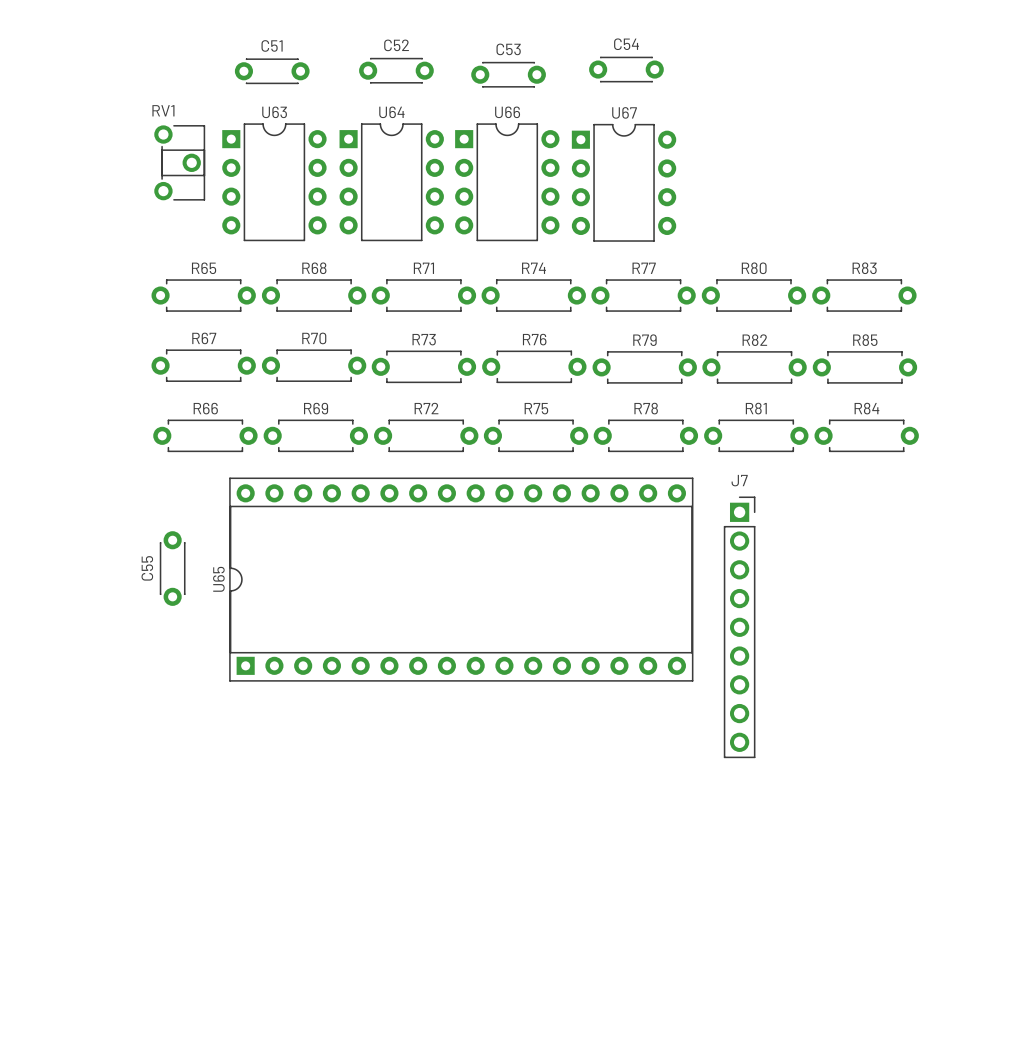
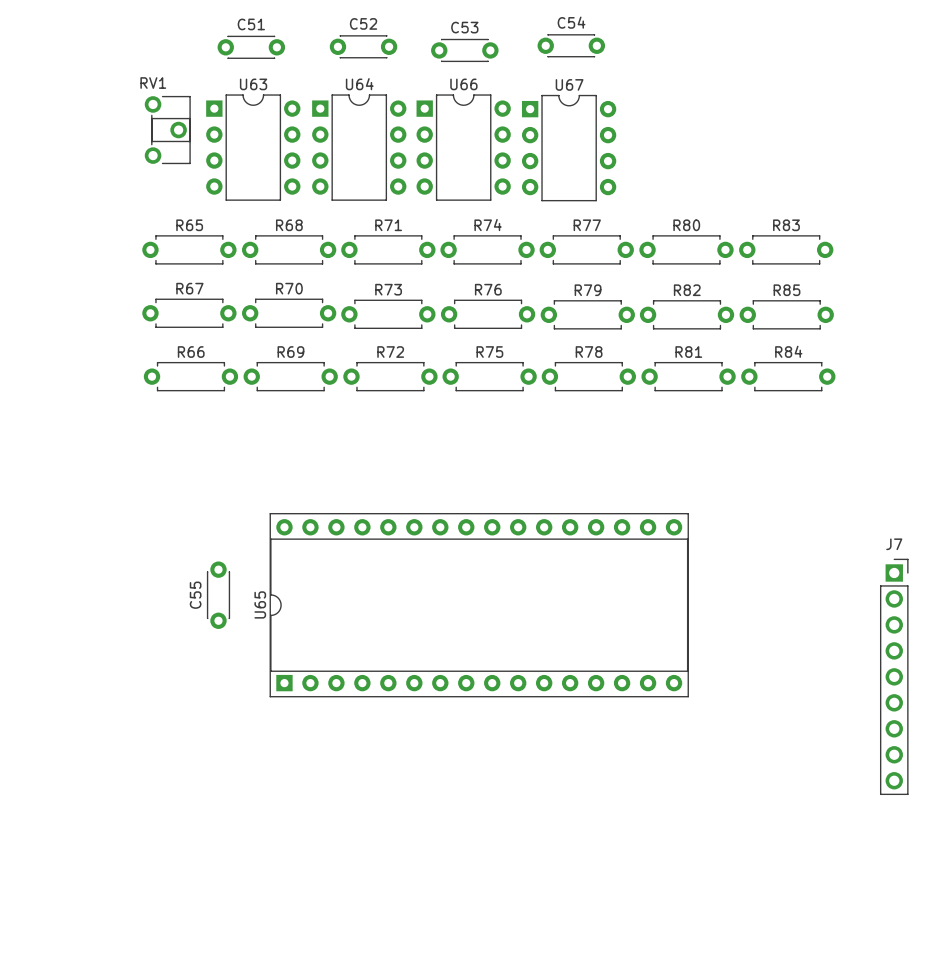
C55 position: (172, 568) -> (218, 595)
U65 position: (461, 579) -> (479, 605)
J7 position: (739, 627) -> (894, 676)

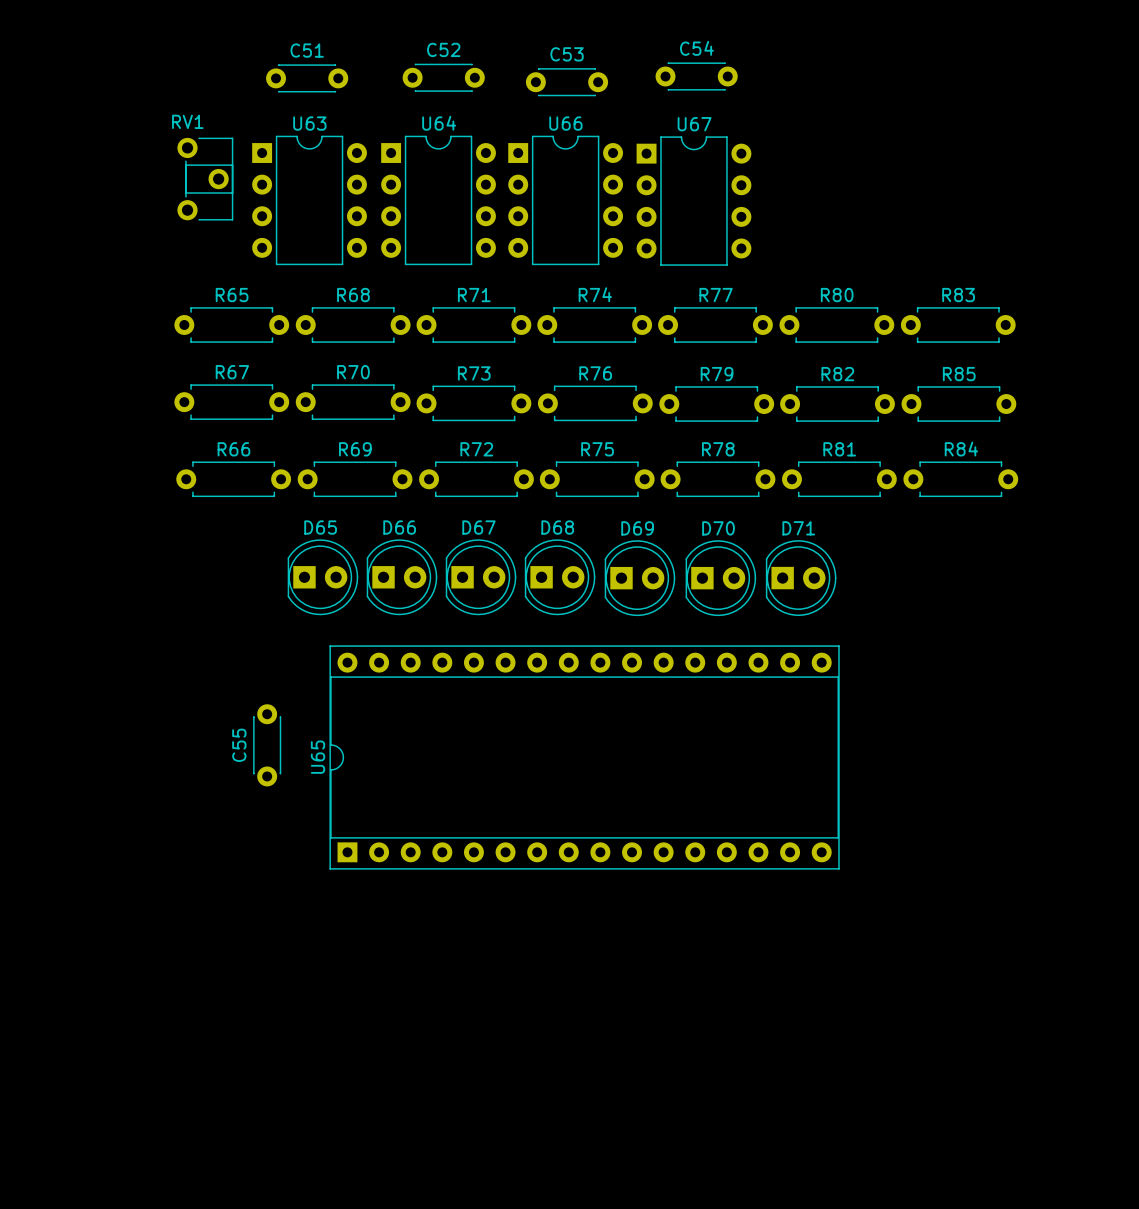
D65: none -> (322, 577)
D66: none -> (402, 577)
D67: none -> (481, 577)
D68: none -> (560, 577)
D69: none -> (639, 578)
D70: none -> (720, 578)
D71: none -> (801, 578)
J7: (894, 676) -> none

